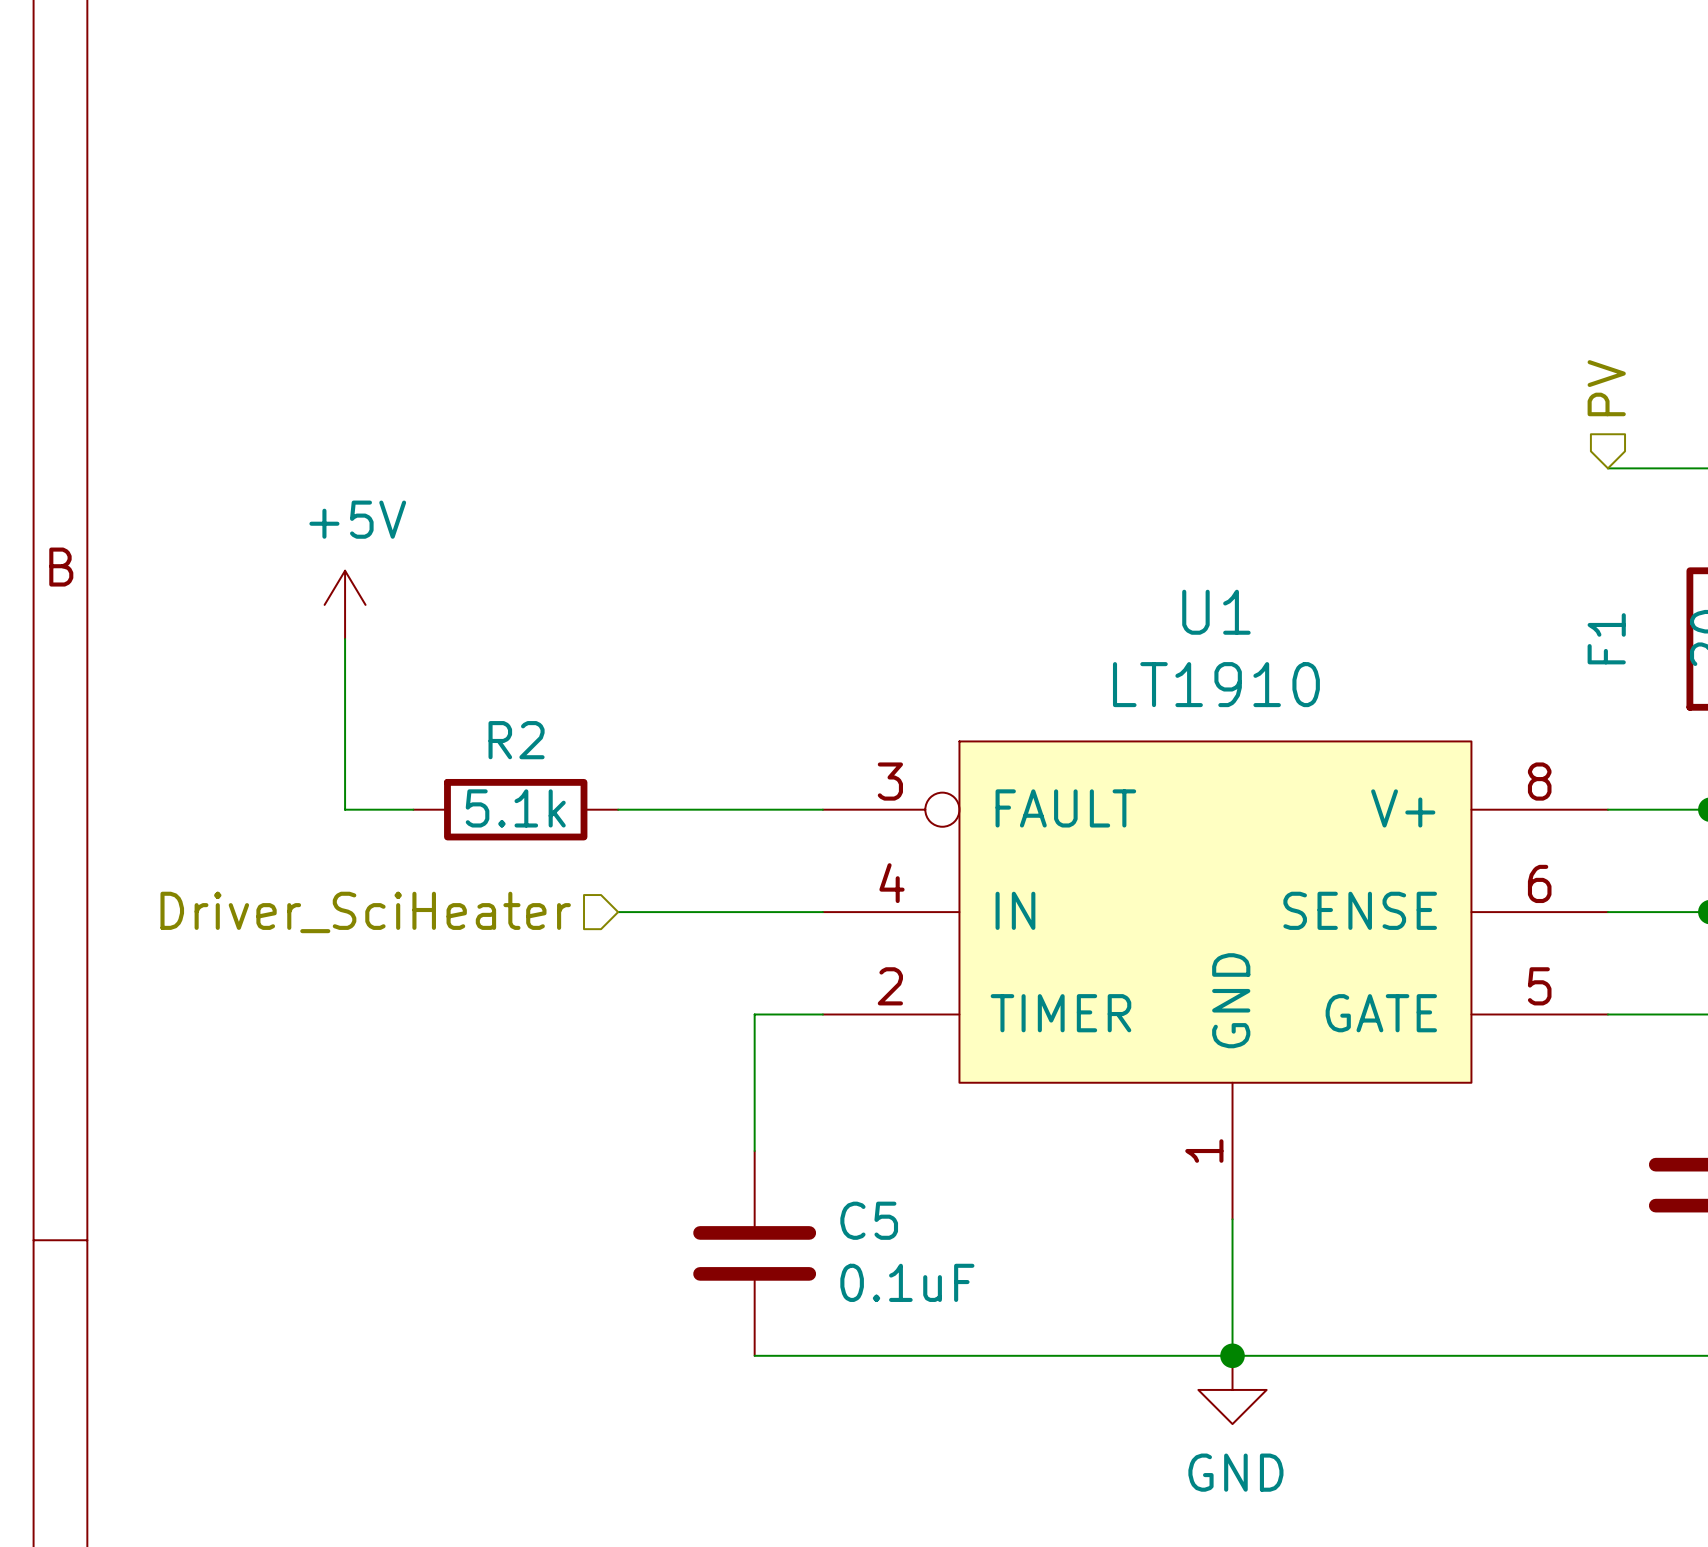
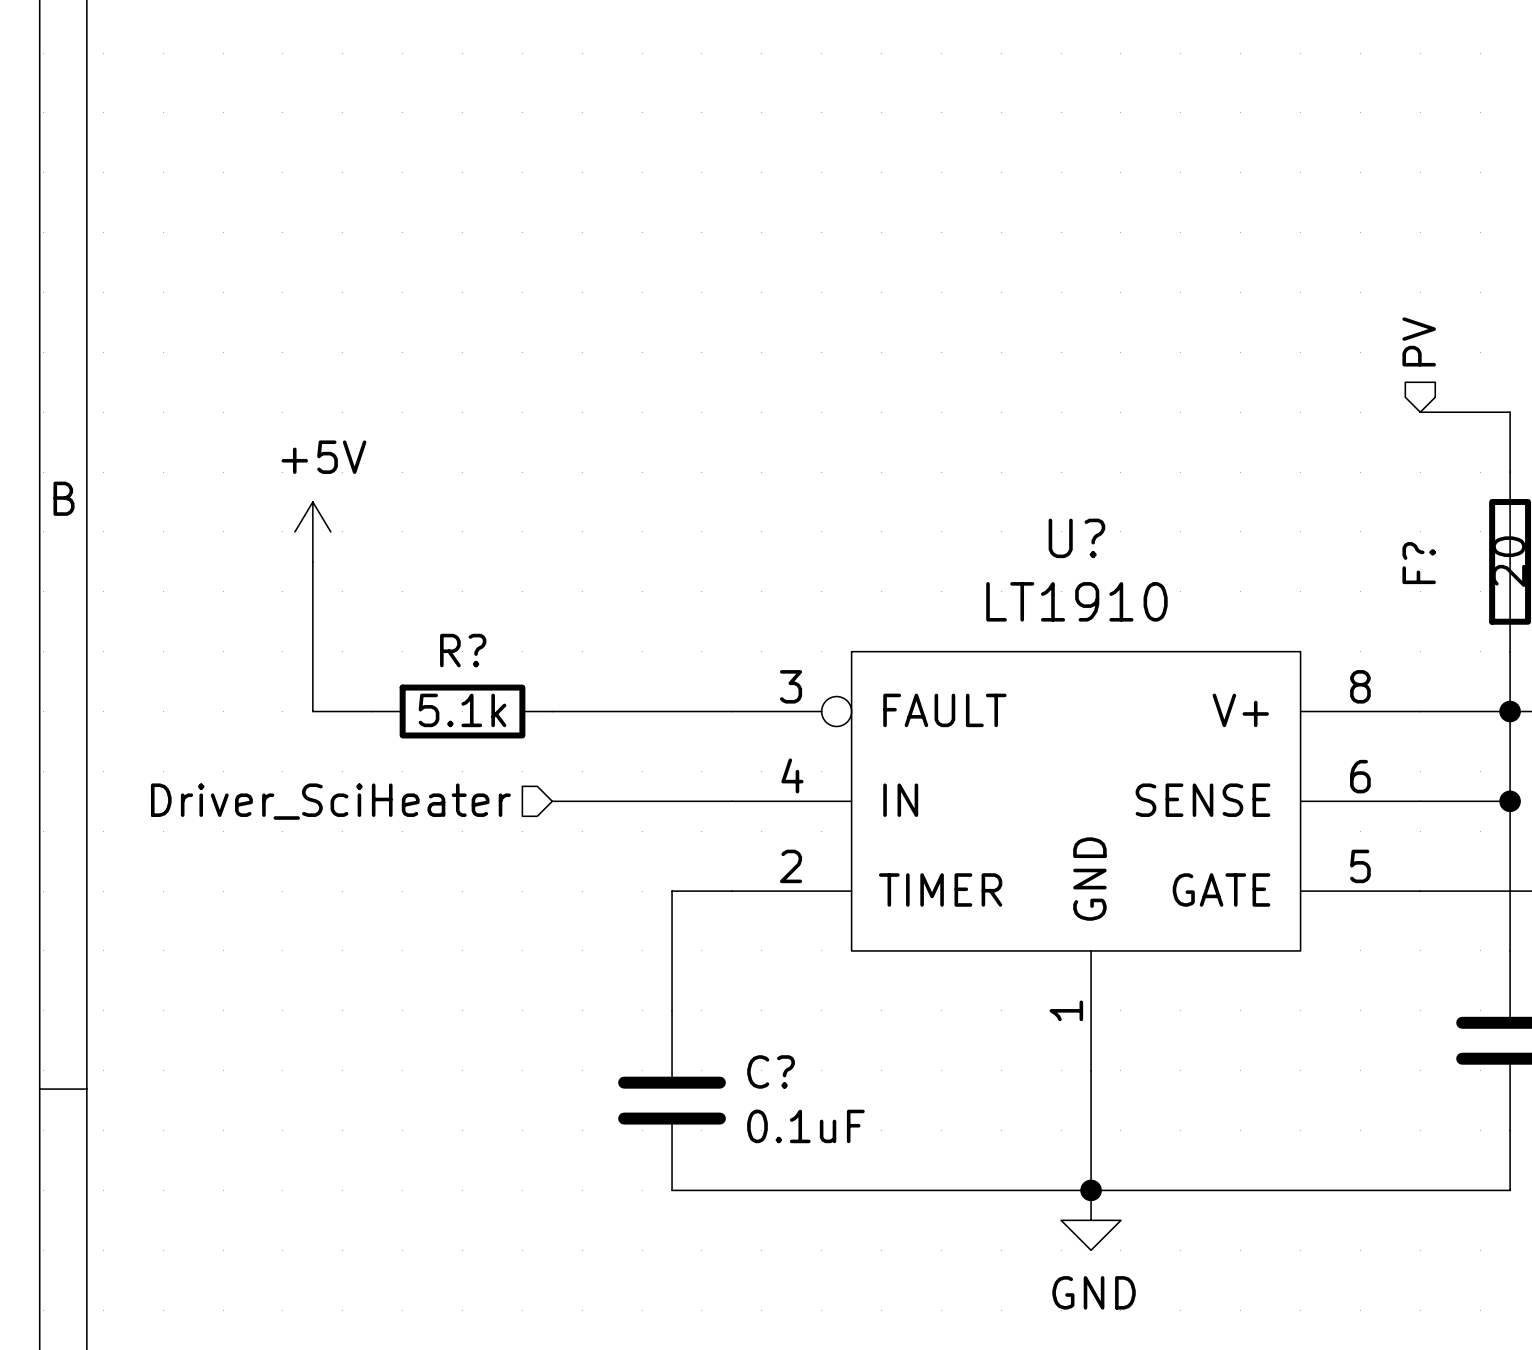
U1 name: U1 (1216, 612) -> U? (1076, 538)
F1 name: F1 (1606, 638) -> F? (1419, 563)
R2 name: R2 (516, 740) -> R? (463, 650)
C5 name: C5 (869, 1220) -> C? (771, 1071)

